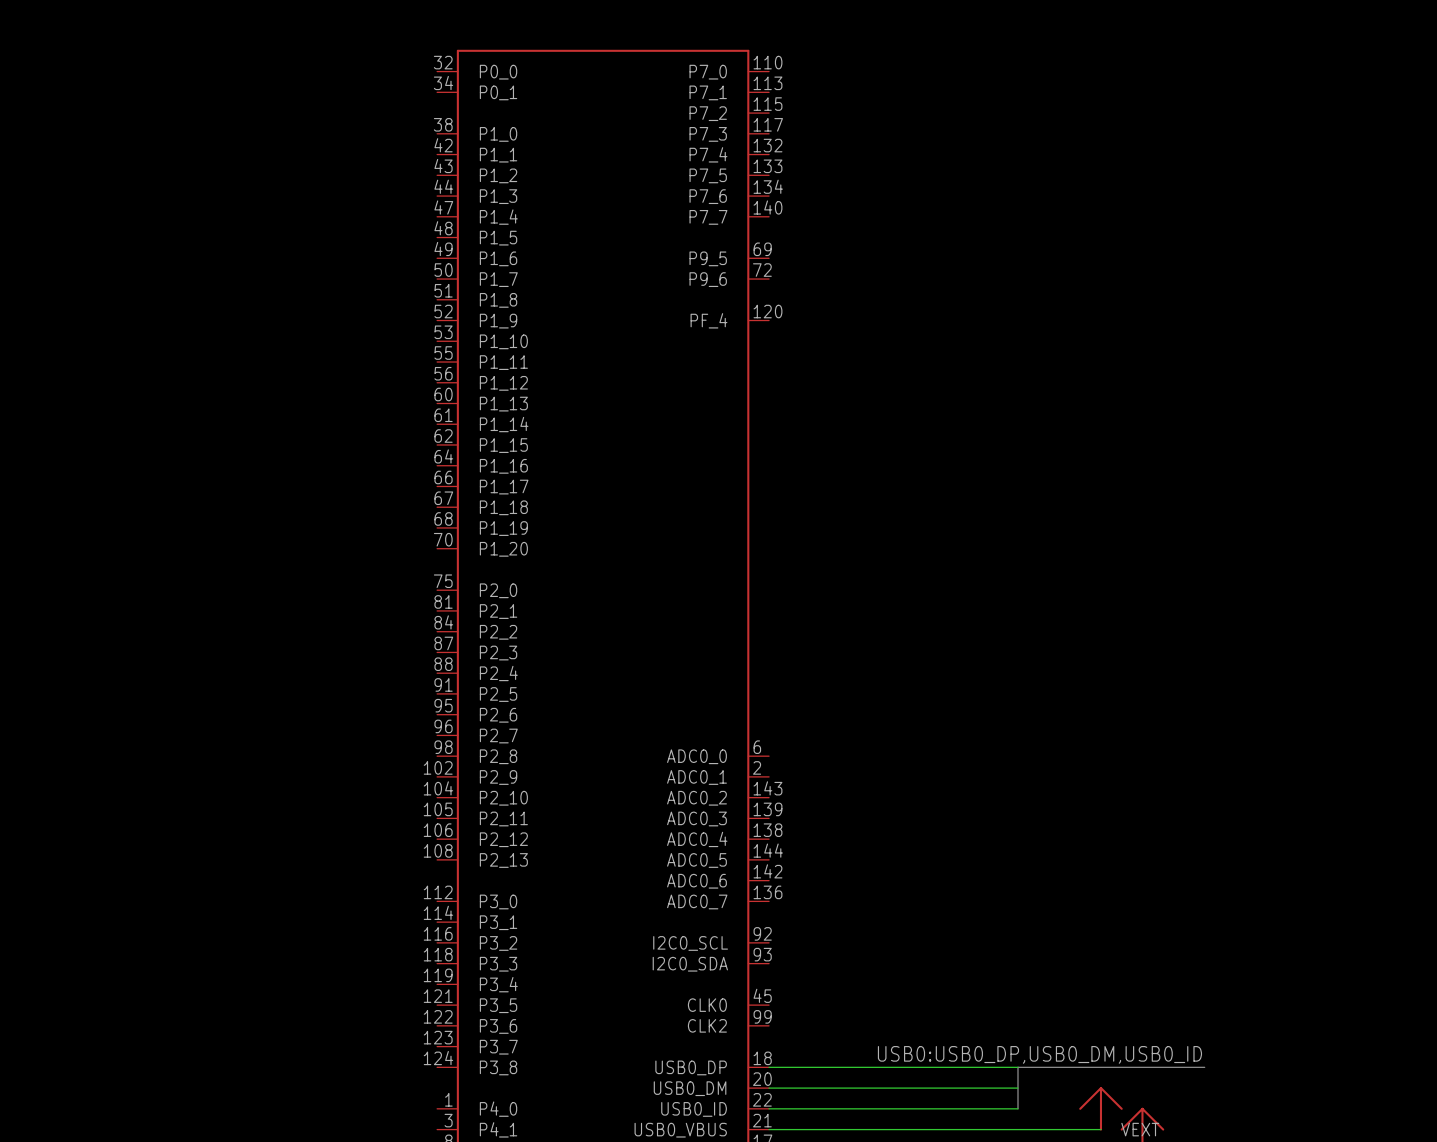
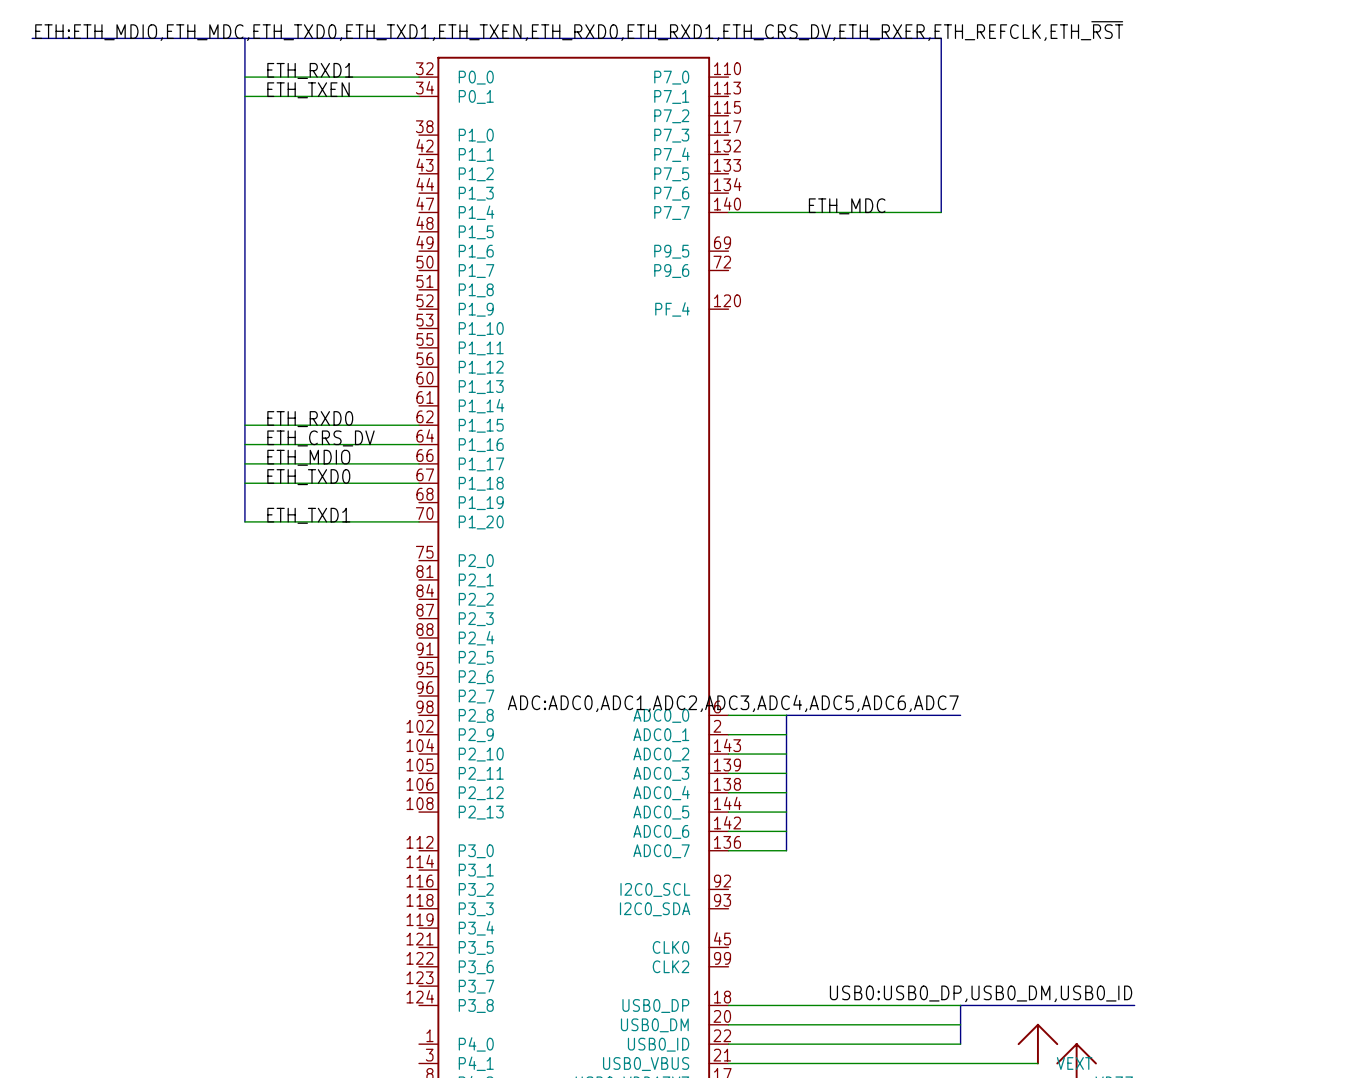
label: none -> ETH:ETH_MDIO,ETH_MDC,ETH_TXD0,ETH_TXD1,ETH_TXEN,ETH_RXD0,ETH_RXD1,ETH_CRS_DV,ETH_RXER,ETH_REFCLK,ETH_~{RST} (579, 31)
bus: none -> (32, 38) (941, 38) (941, 212)
bus: none -> (244, 38) (244, 521)
label: none -> ETH_RXD1 (310, 70)
wire: none -> (244, 77) (419, 77)
label: none -> ETH_TXEN (308, 90)
wire: none -> (244, 96) (419, 96)
label: none -> ETH_MDC (847, 206)
wire: none -> (728, 212) (941, 212)
label: none -> ETH_RXD0 (310, 419)
wire: none -> (244, 425) (419, 425)
label: none -> ETH_CRS_DV (320, 438)
wire: none -> (244, 444) (419, 444)
label: none -> ETH_MDIO (308, 457)
wire: none -> (244, 463) (419, 463)
label: none -> ETH_TXD0 (308, 477)
wire: none -> (244, 483) (419, 483)
label: none -> ETH_TXD1 (308, 515)
wire: none -> (244, 521) (419, 521)
label: none -> ADC:ADC0,ADC1,ADC2,ADC3,ADC4,ADC5,ADC6,ADC7 (733, 703)
wire: none -> (728, 715) (786, 715)
bus: none -> (960, 715) (786, 715) (786, 850)
wire: none -> (728, 734) (786, 734)
wire: none -> (728, 754) (786, 754)
wire: none -> (728, 773) (786, 773)
wire: none -> (728, 792) (786, 792)
wire: none -> (728, 812) (786, 812)
wire: none -> (728, 831) (786, 831)
wire: none -> (728, 850) (786, 850)

